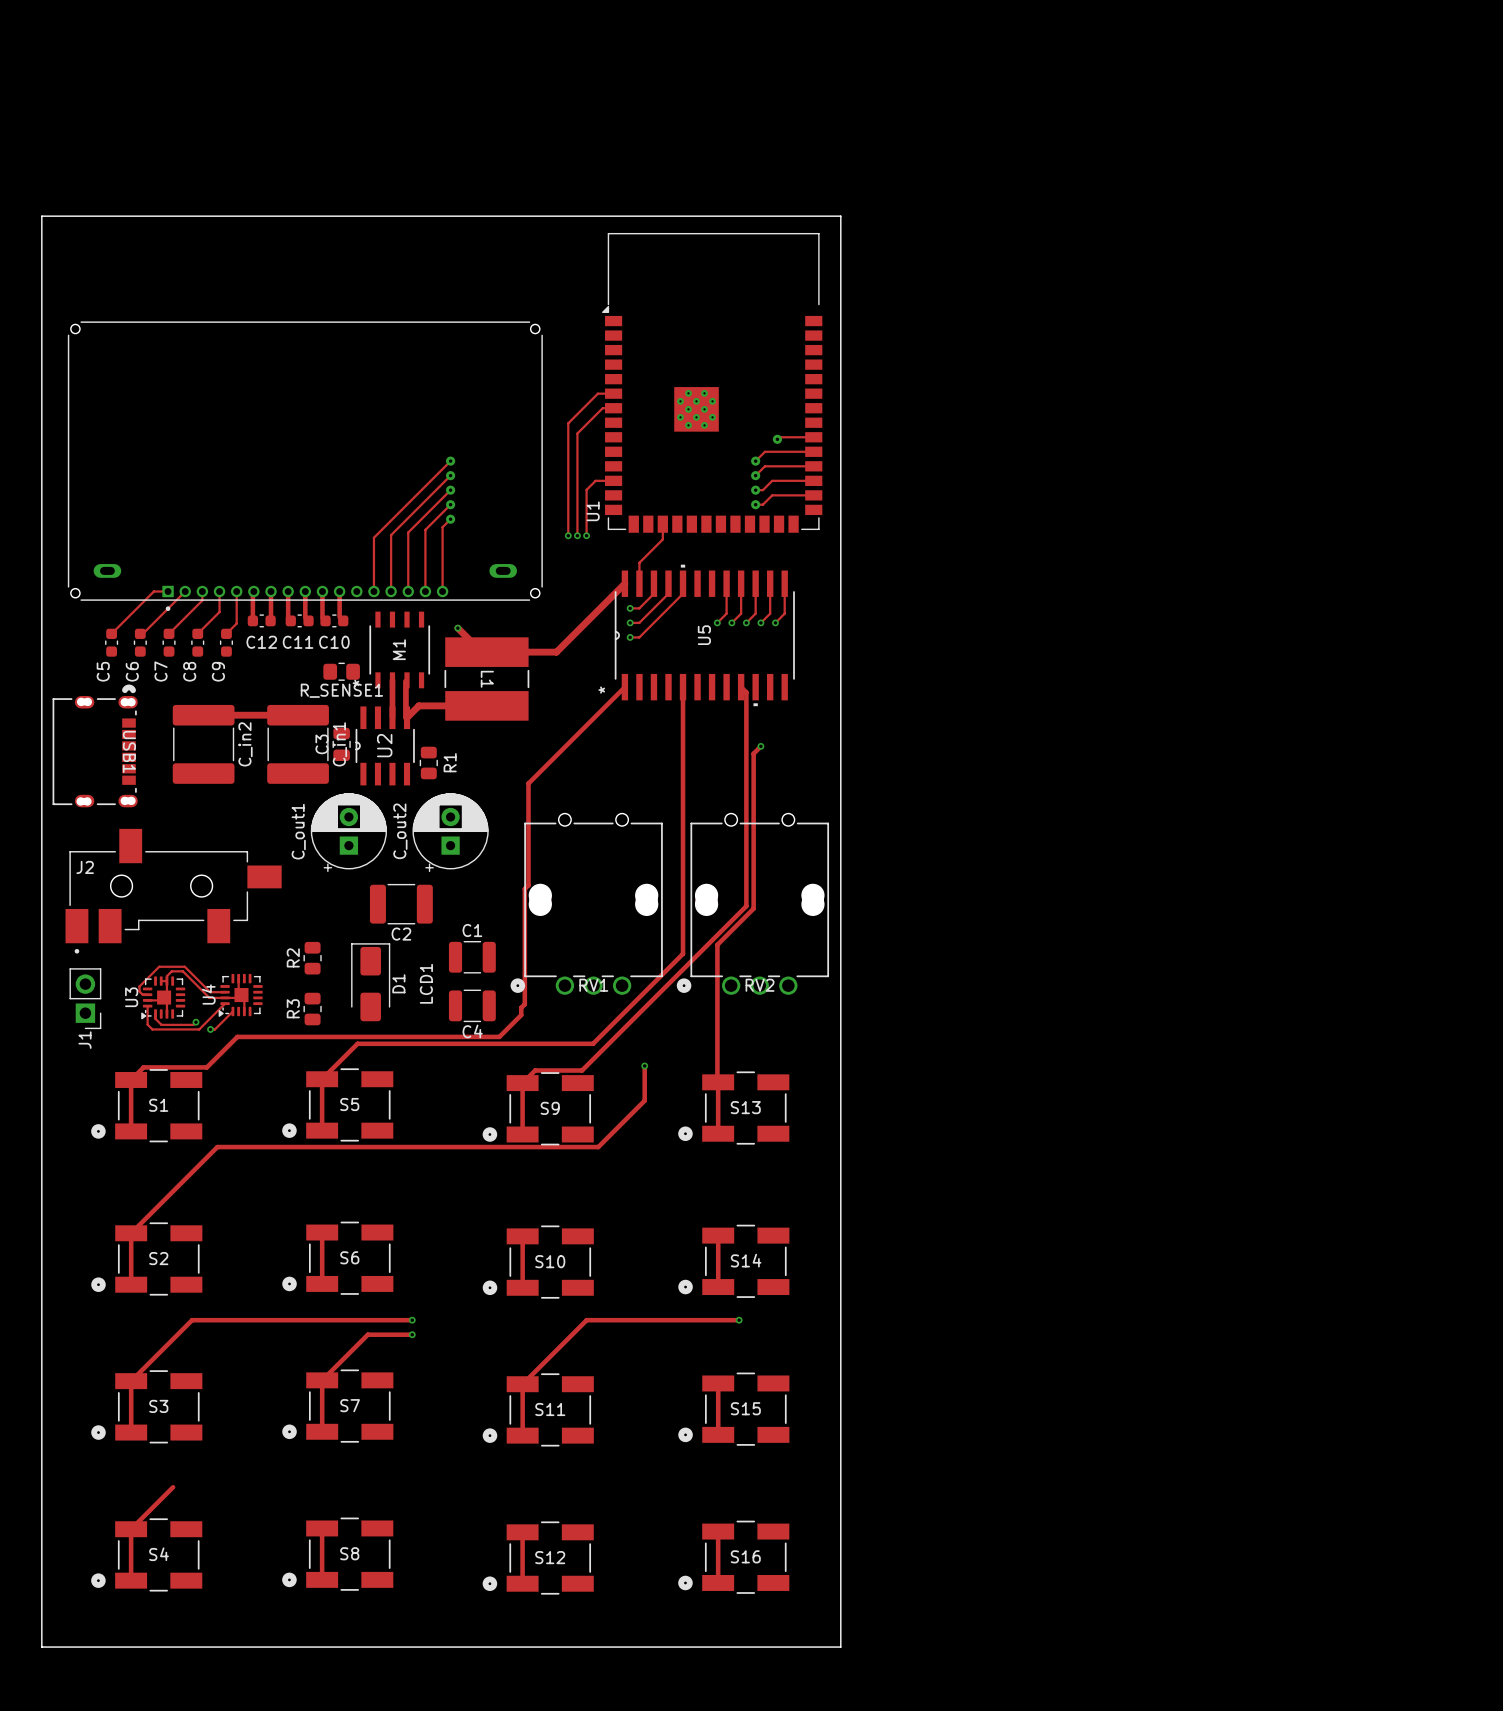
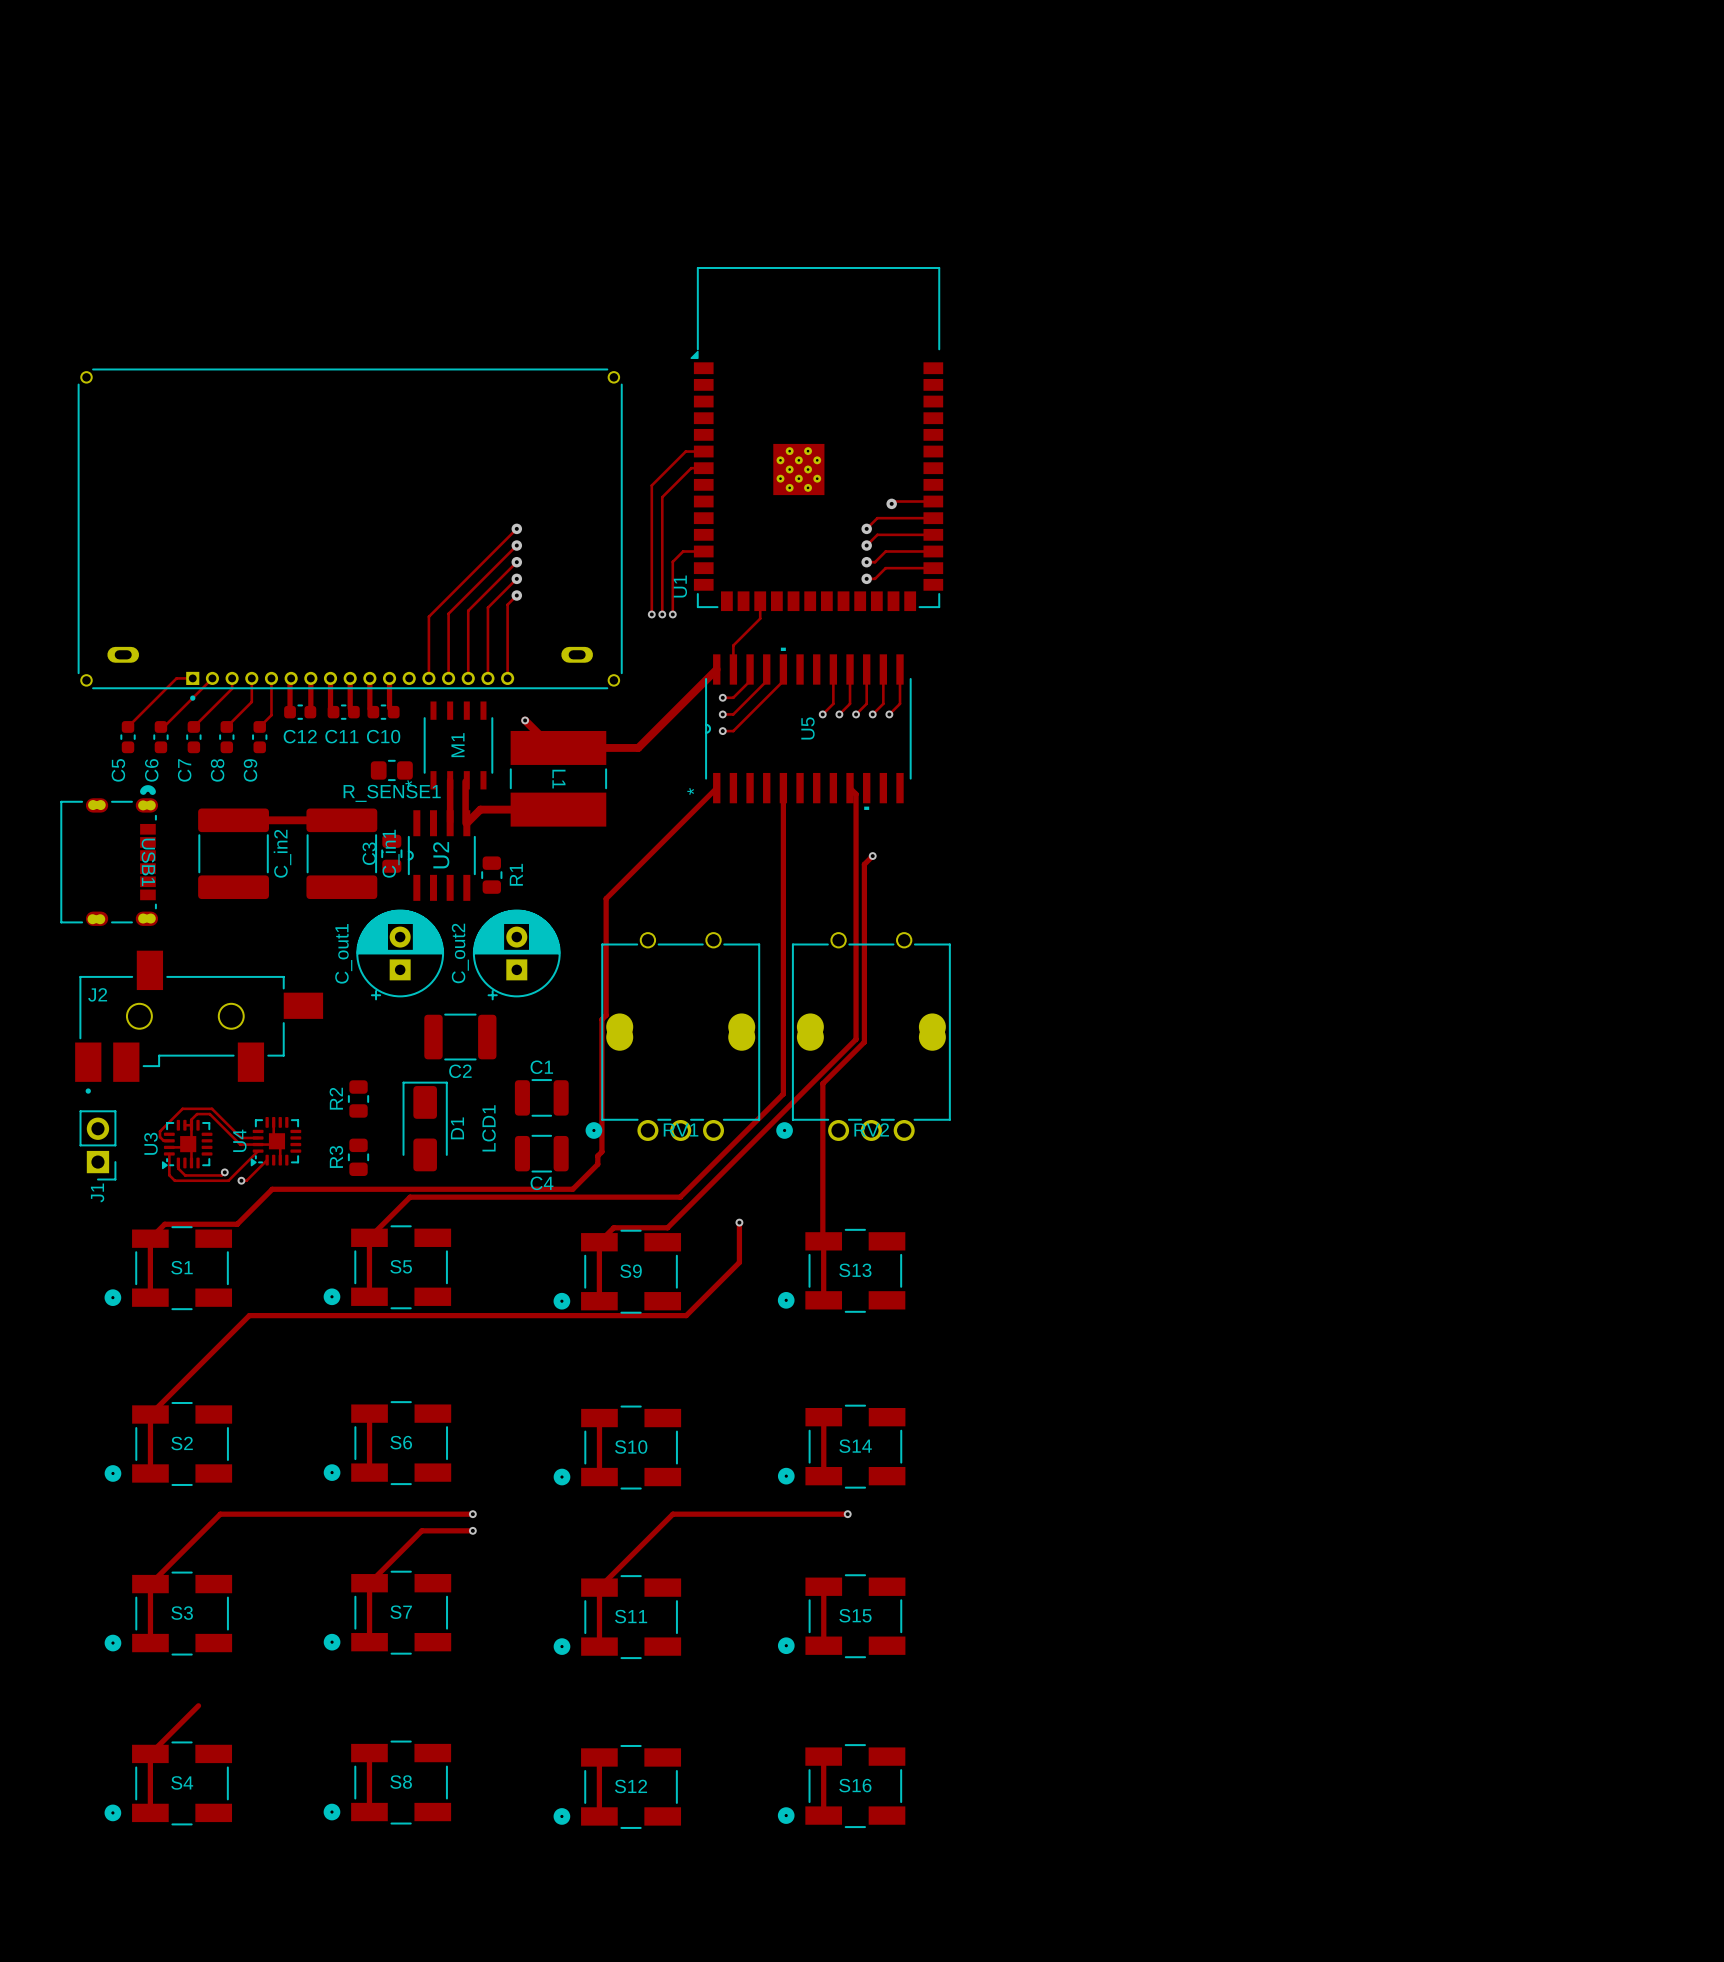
board edge: (41, 216) (41, 1647) (840, 1647) (840, 216) (41, 216) -> none

